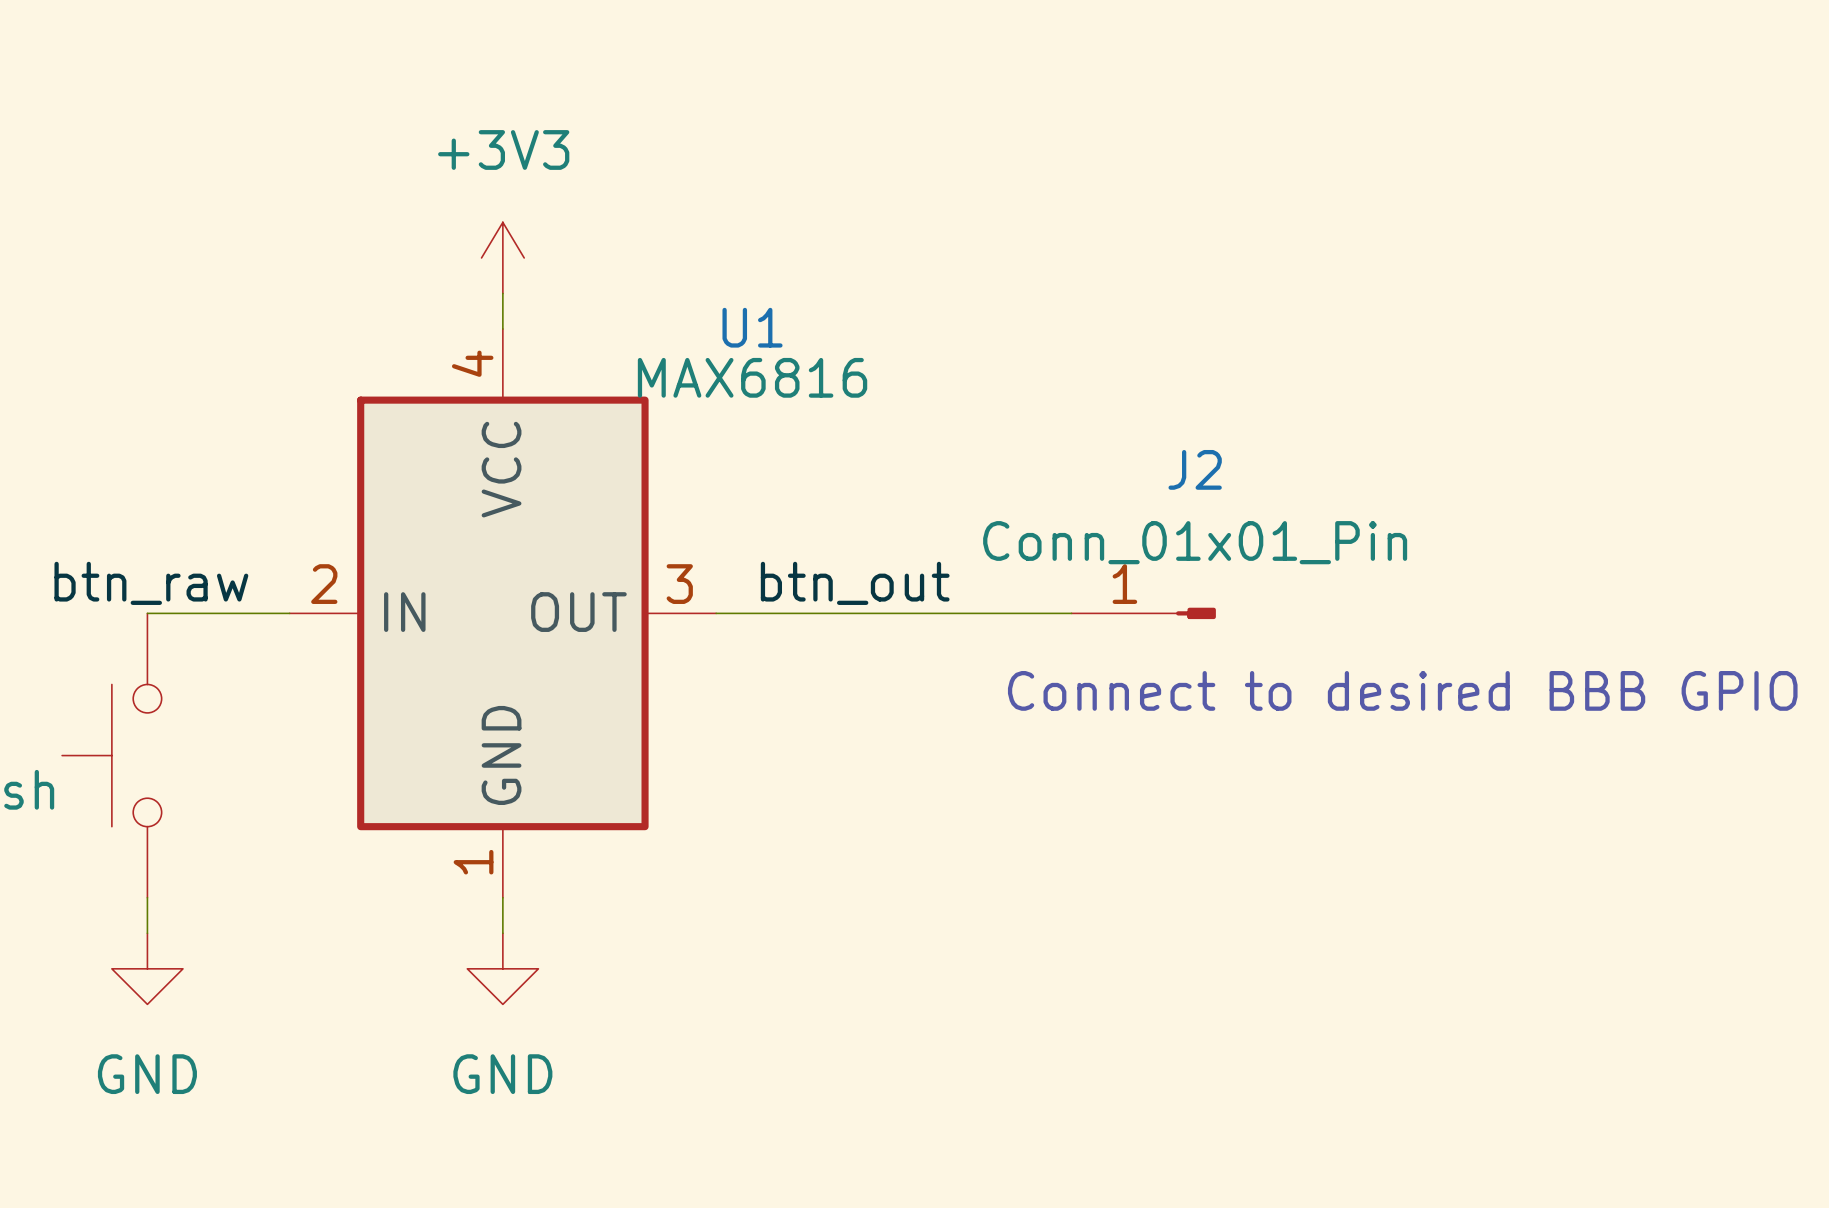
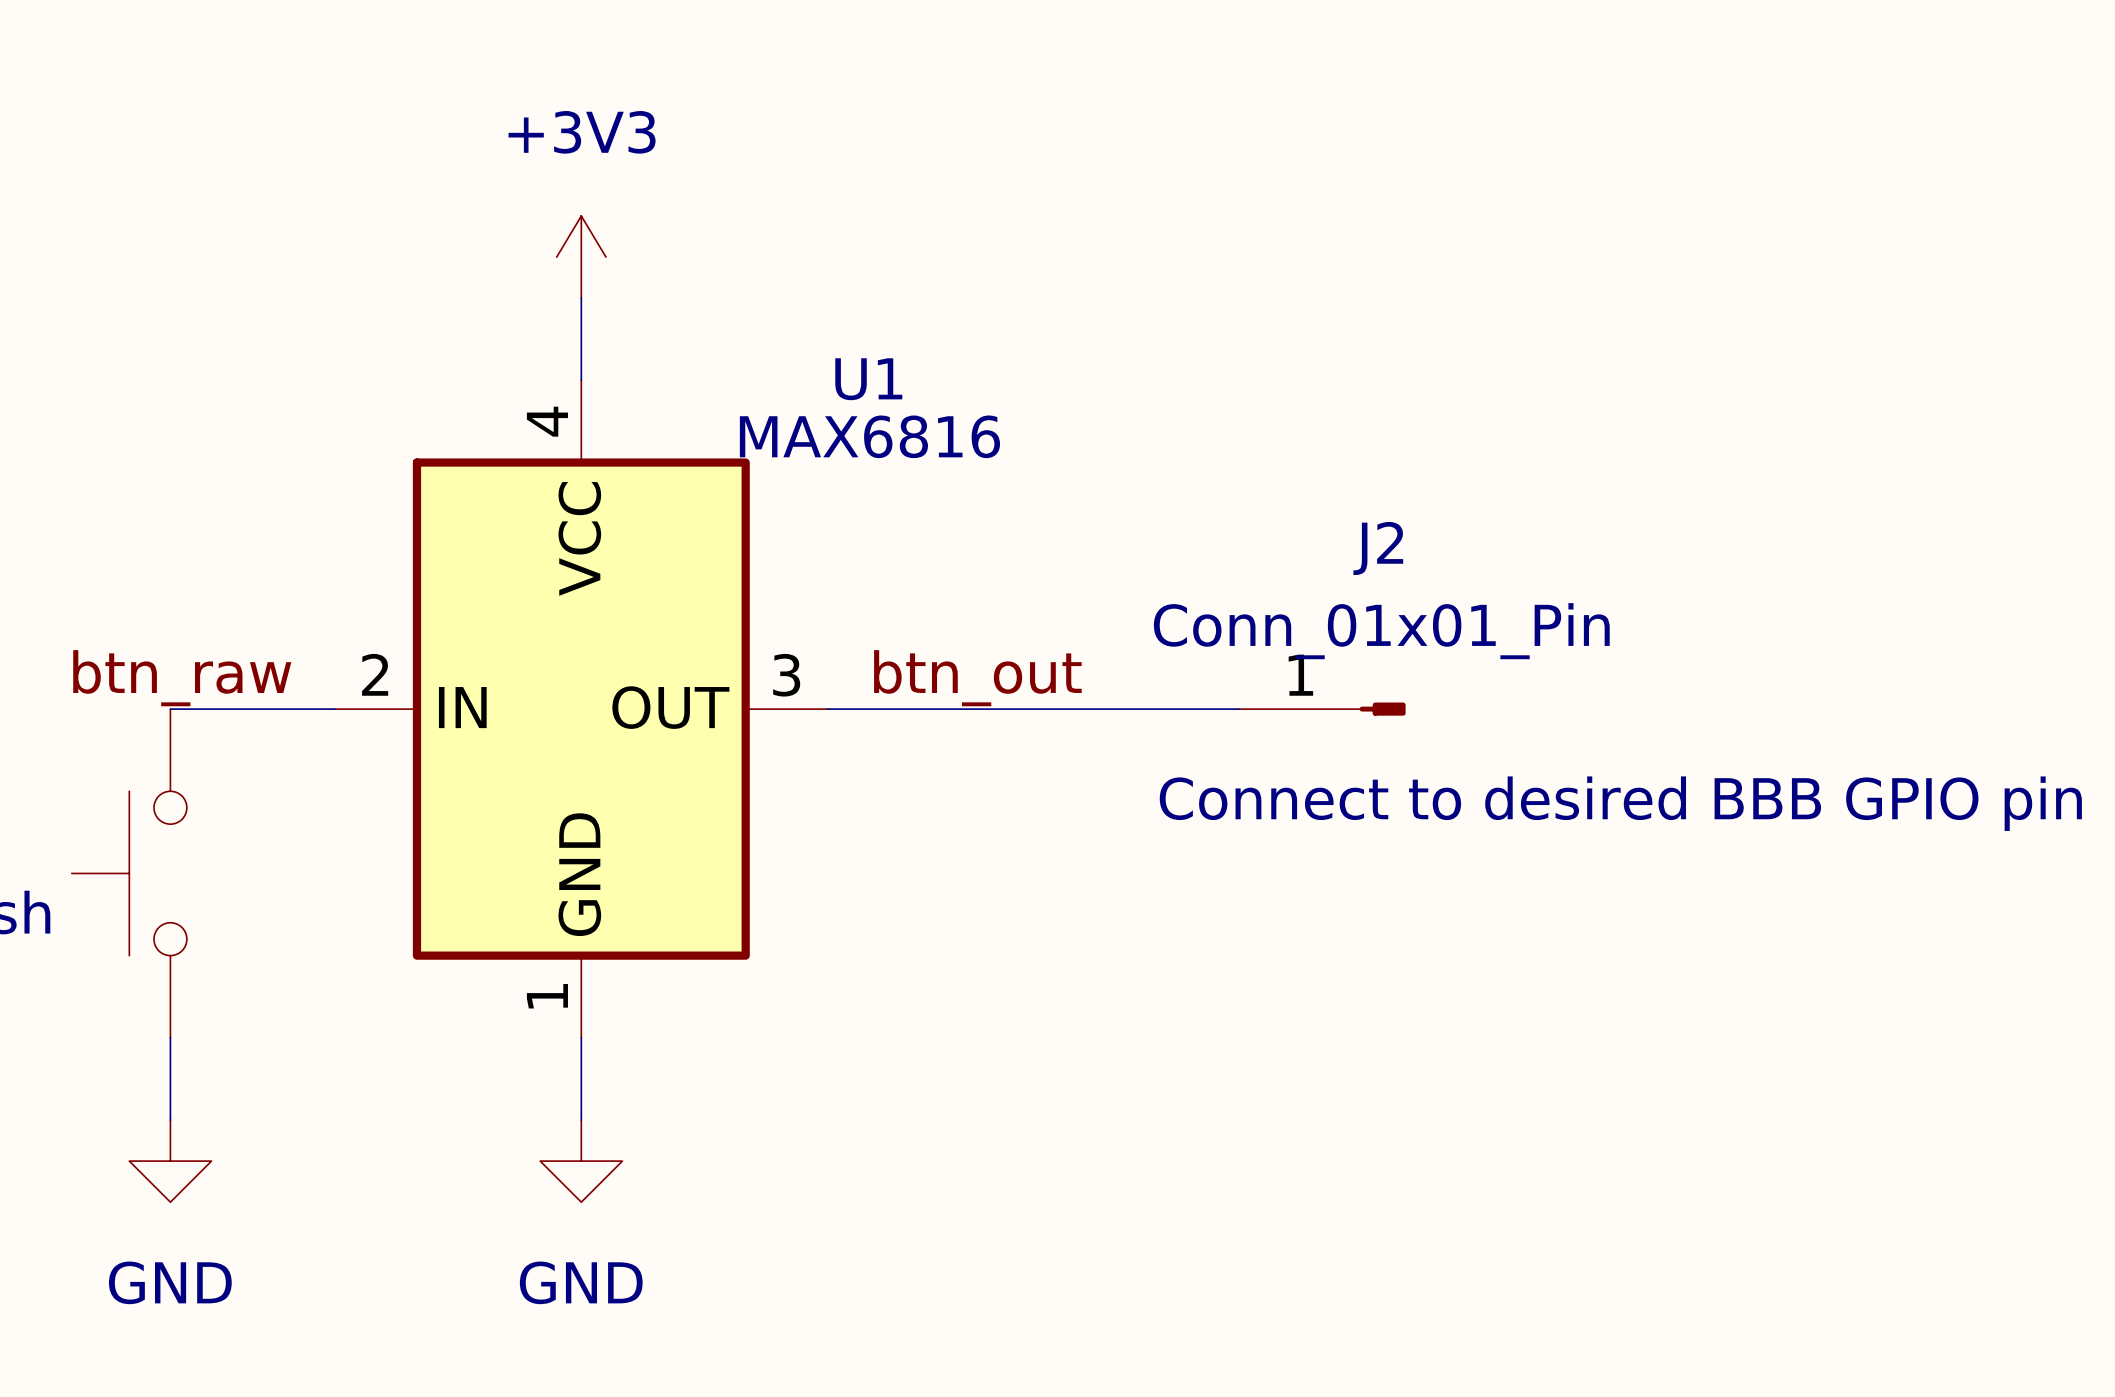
power symbol position: +3V3 (502, 257) -> +3V3 (581, 257)
power symbol position: GND (147, 968) -> GND (170, 1161)
power symbol position: GND (502, 968) -> GND (581, 1161)

